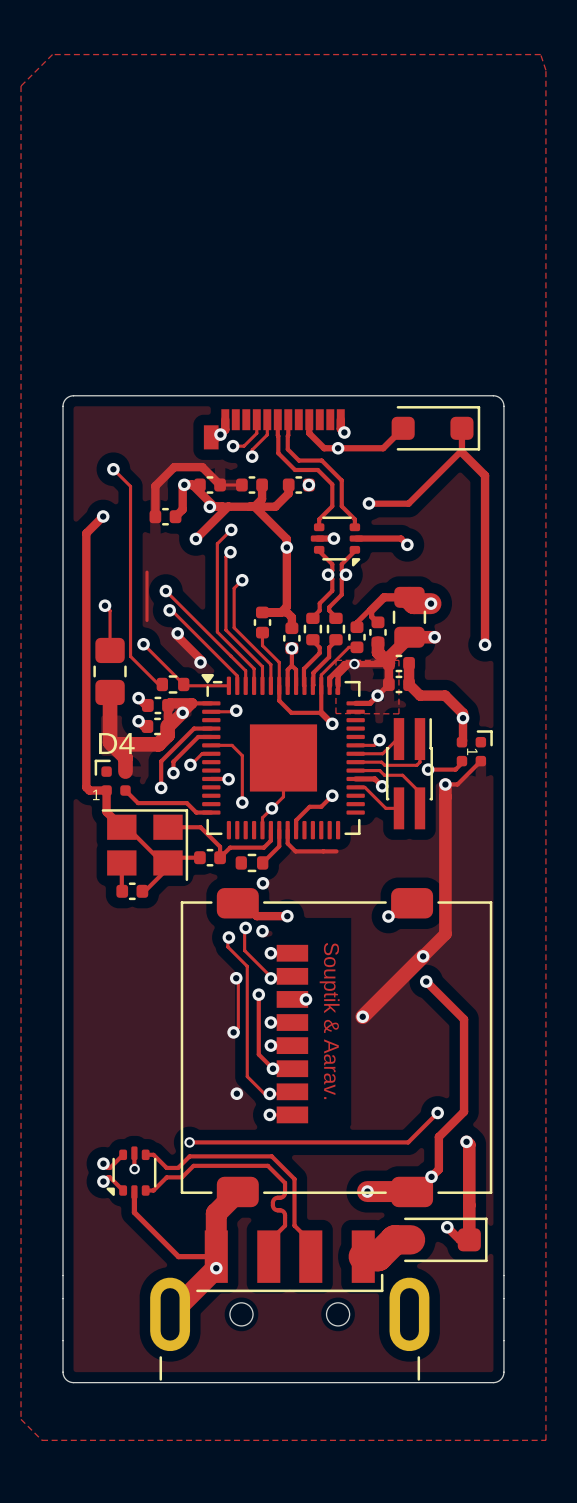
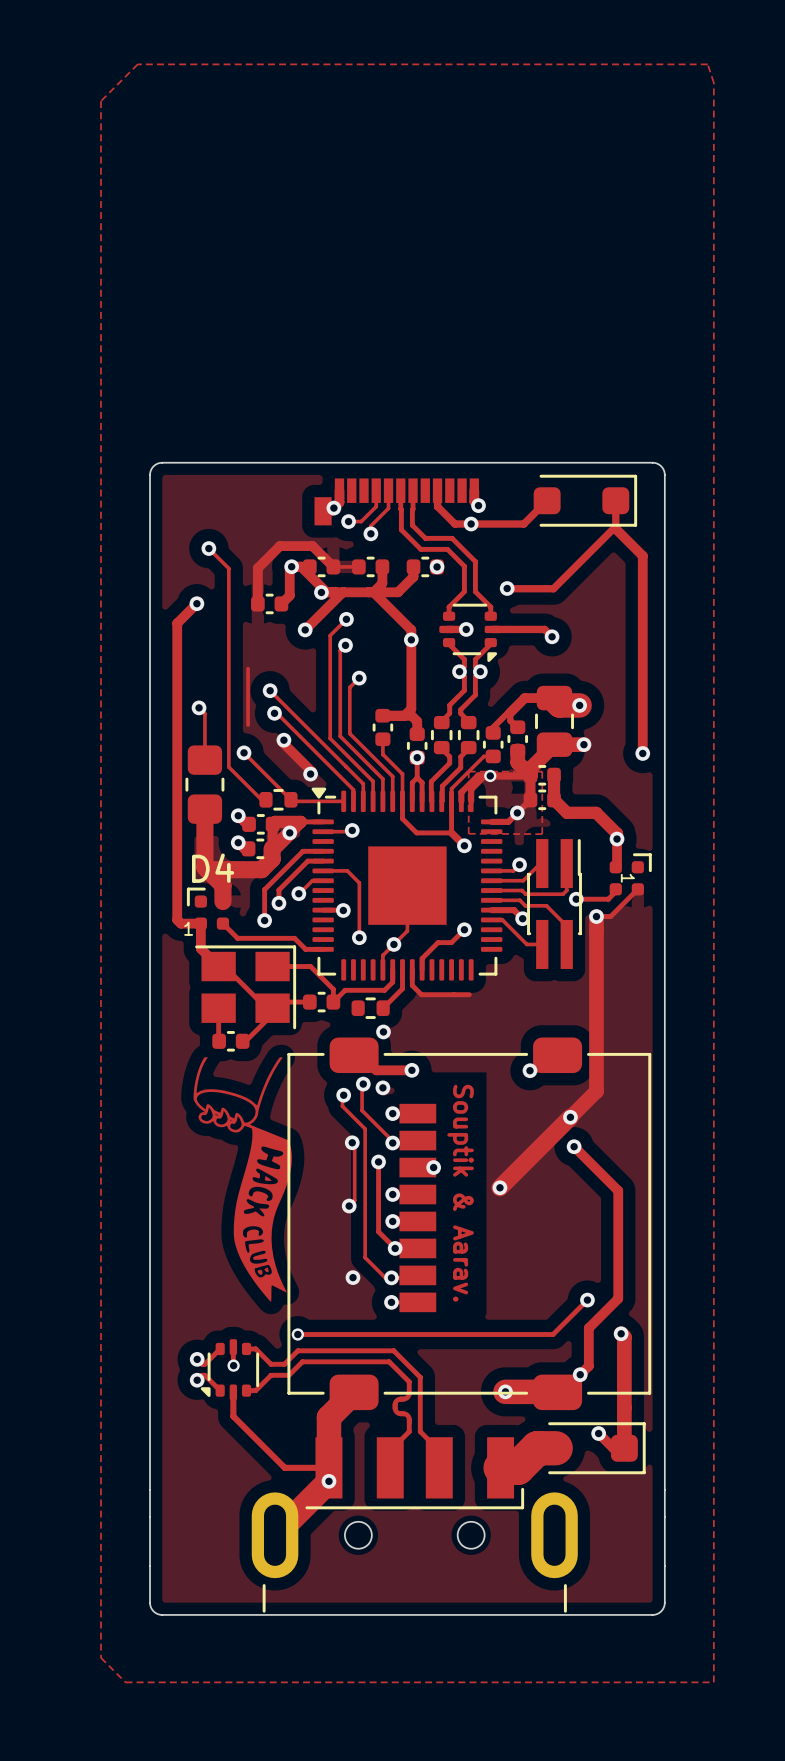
drawing: none -> [193, 1057, 292, 1302]

